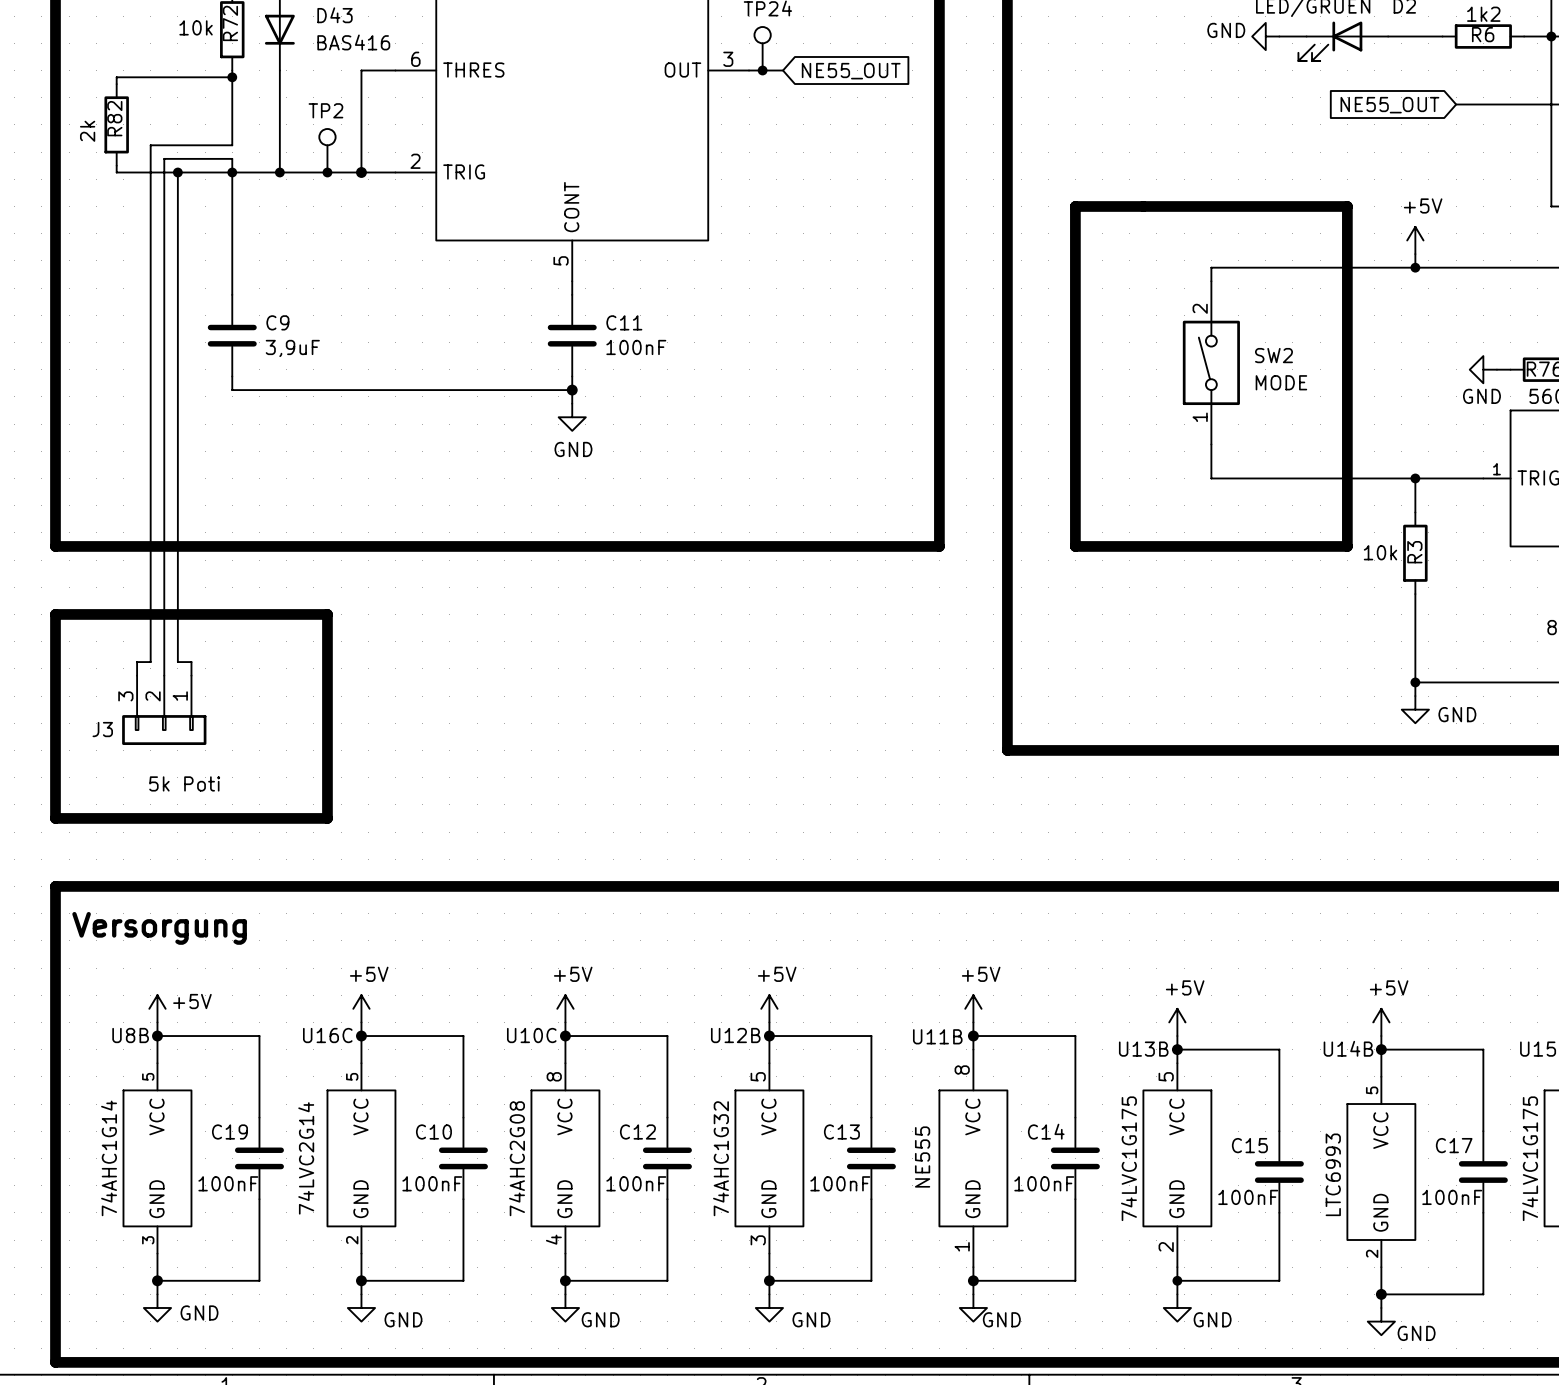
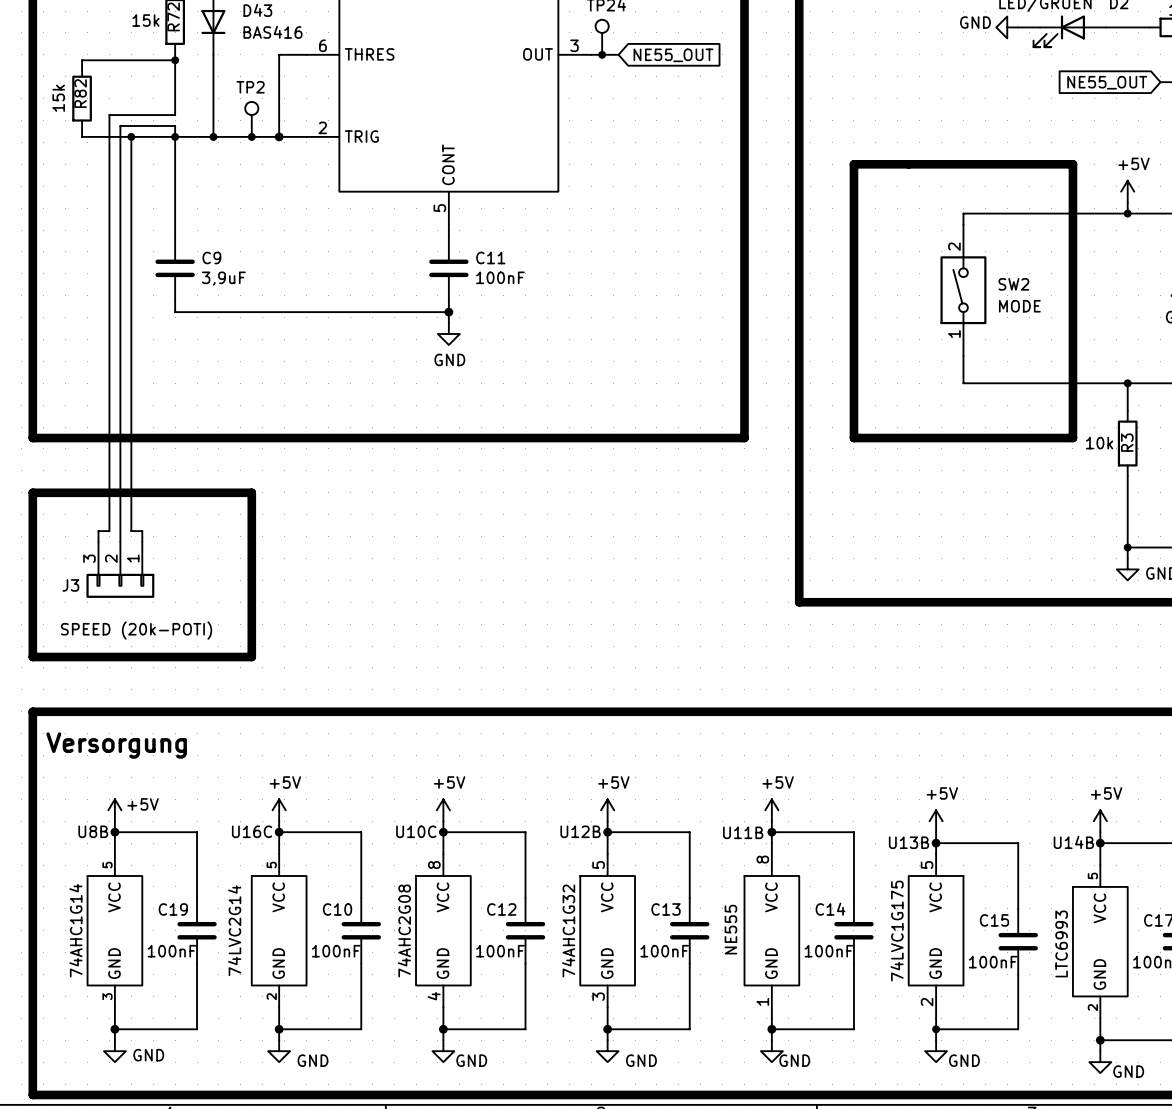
R72 value: 10k (196, 27) -> 15k (145, 20)
R82 value: 2k (87, 131) -> 15k (58, 98)
J3 value: 5k Poti (184, 783) -> SPEED (20k-POTI) (136, 630)

